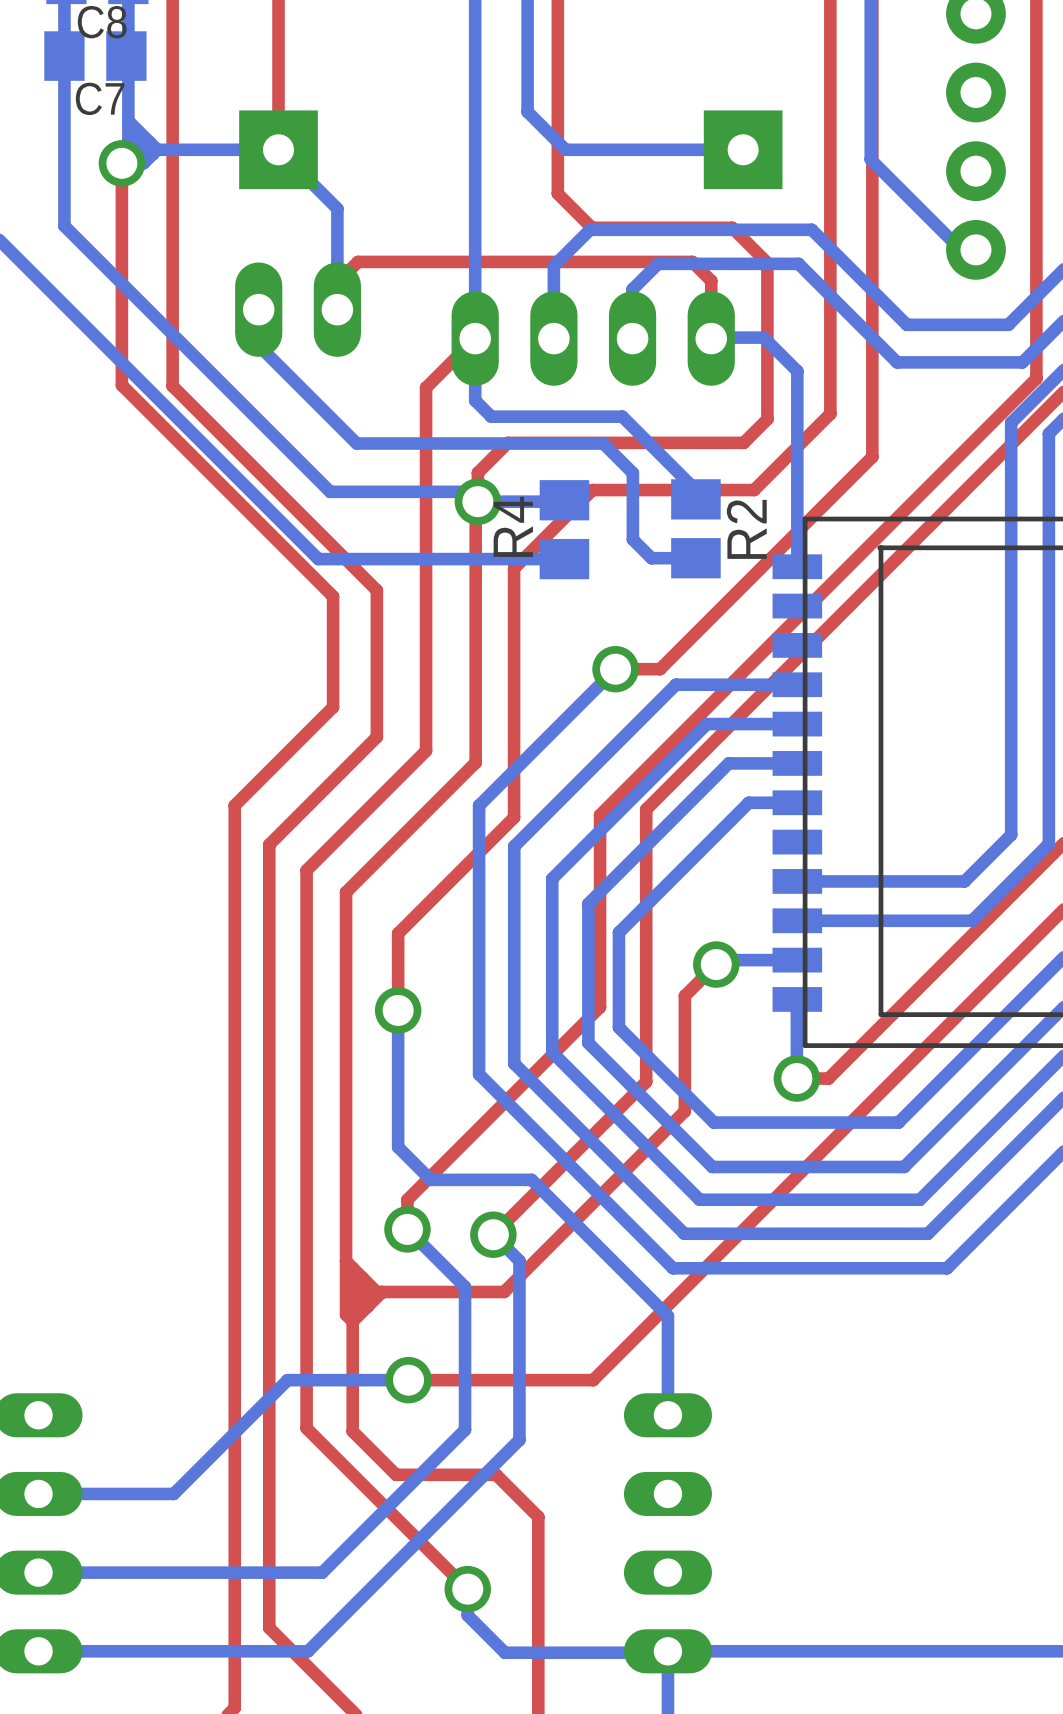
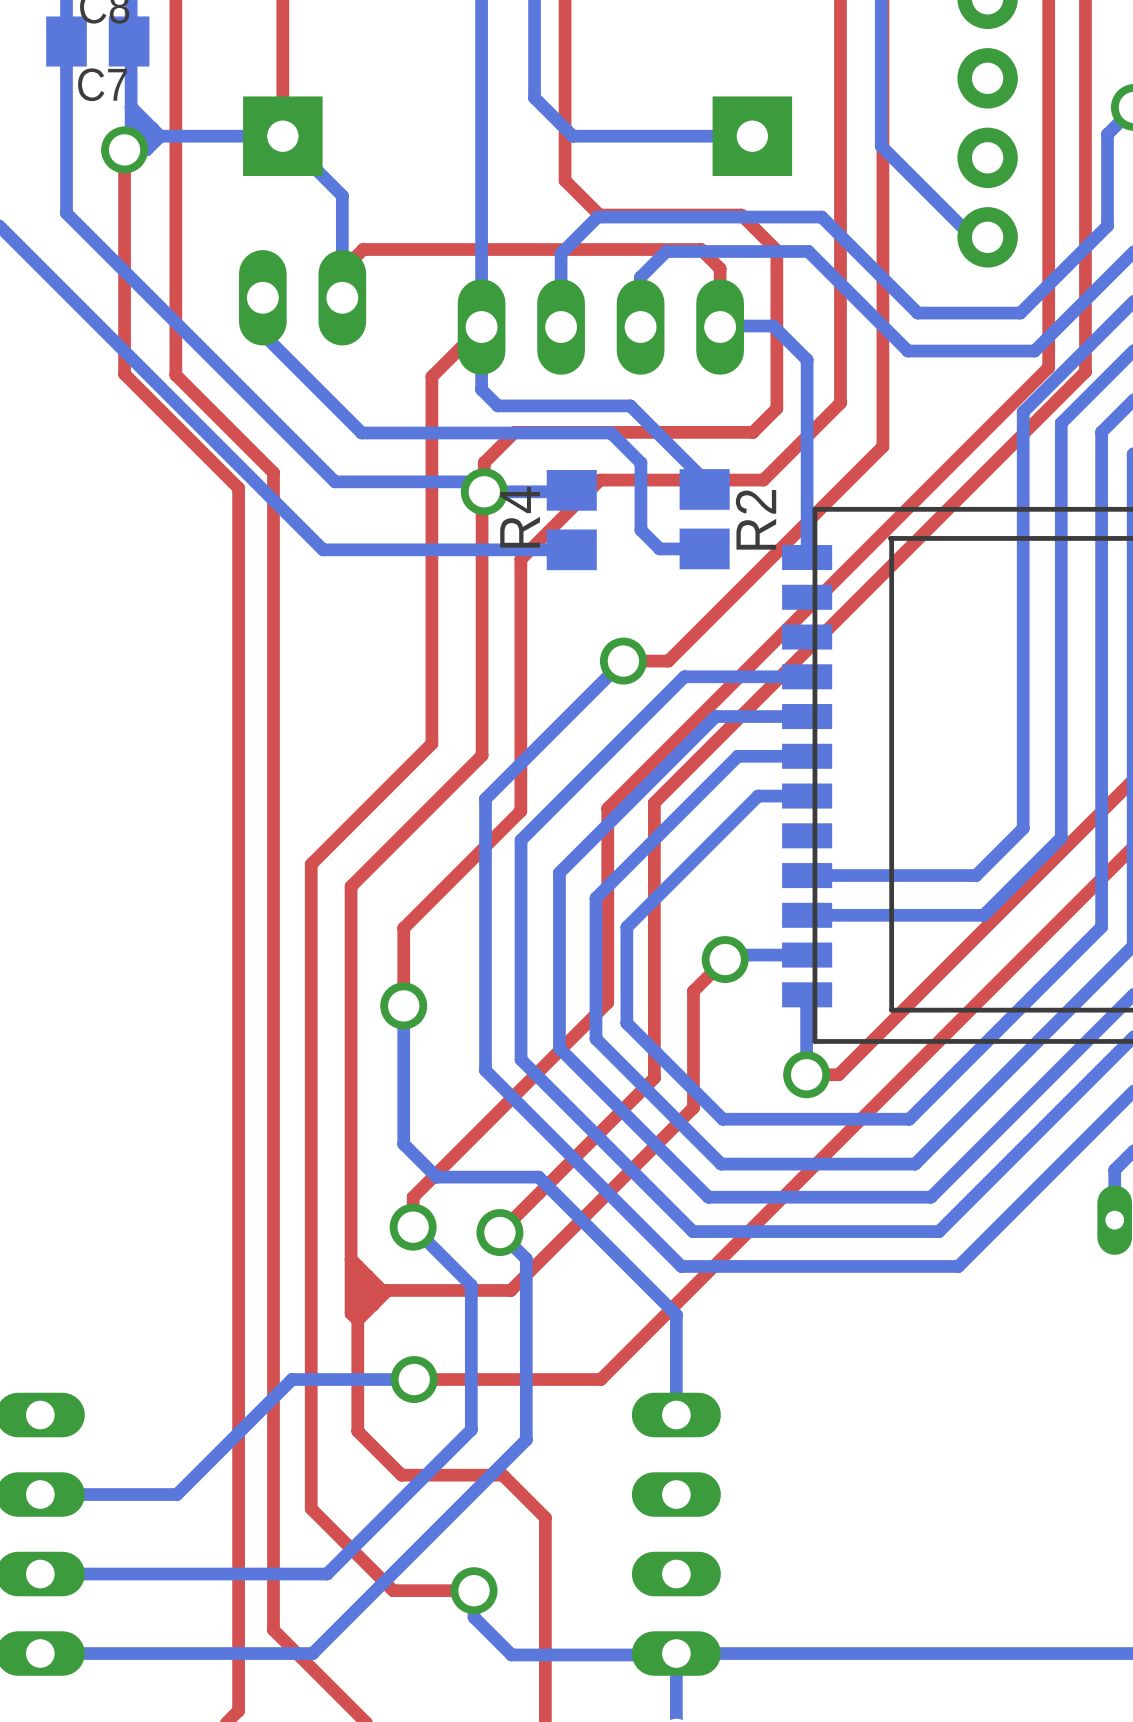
top track: (269, 482) (376, 590) (376, 737) (269, 844) -> (273, 472) (273, 838)
top track: (234, 498) (333, 596) (333, 707) (234, 805) -> (238, 488) (238, 798)
top track: (306, 1428) (467, 1589) -> (311, 1428) (311, 1508) (393, 1590) (473, 1590)

